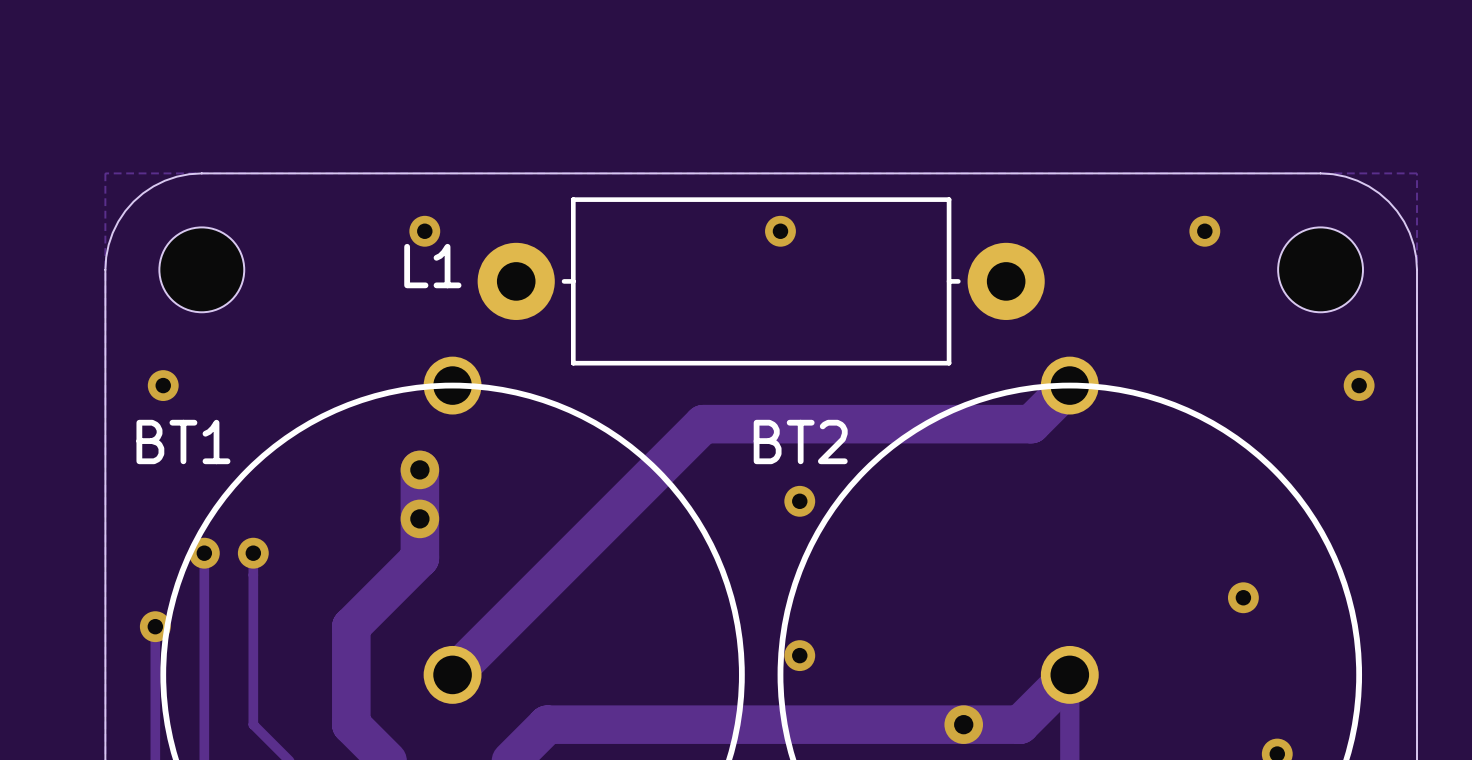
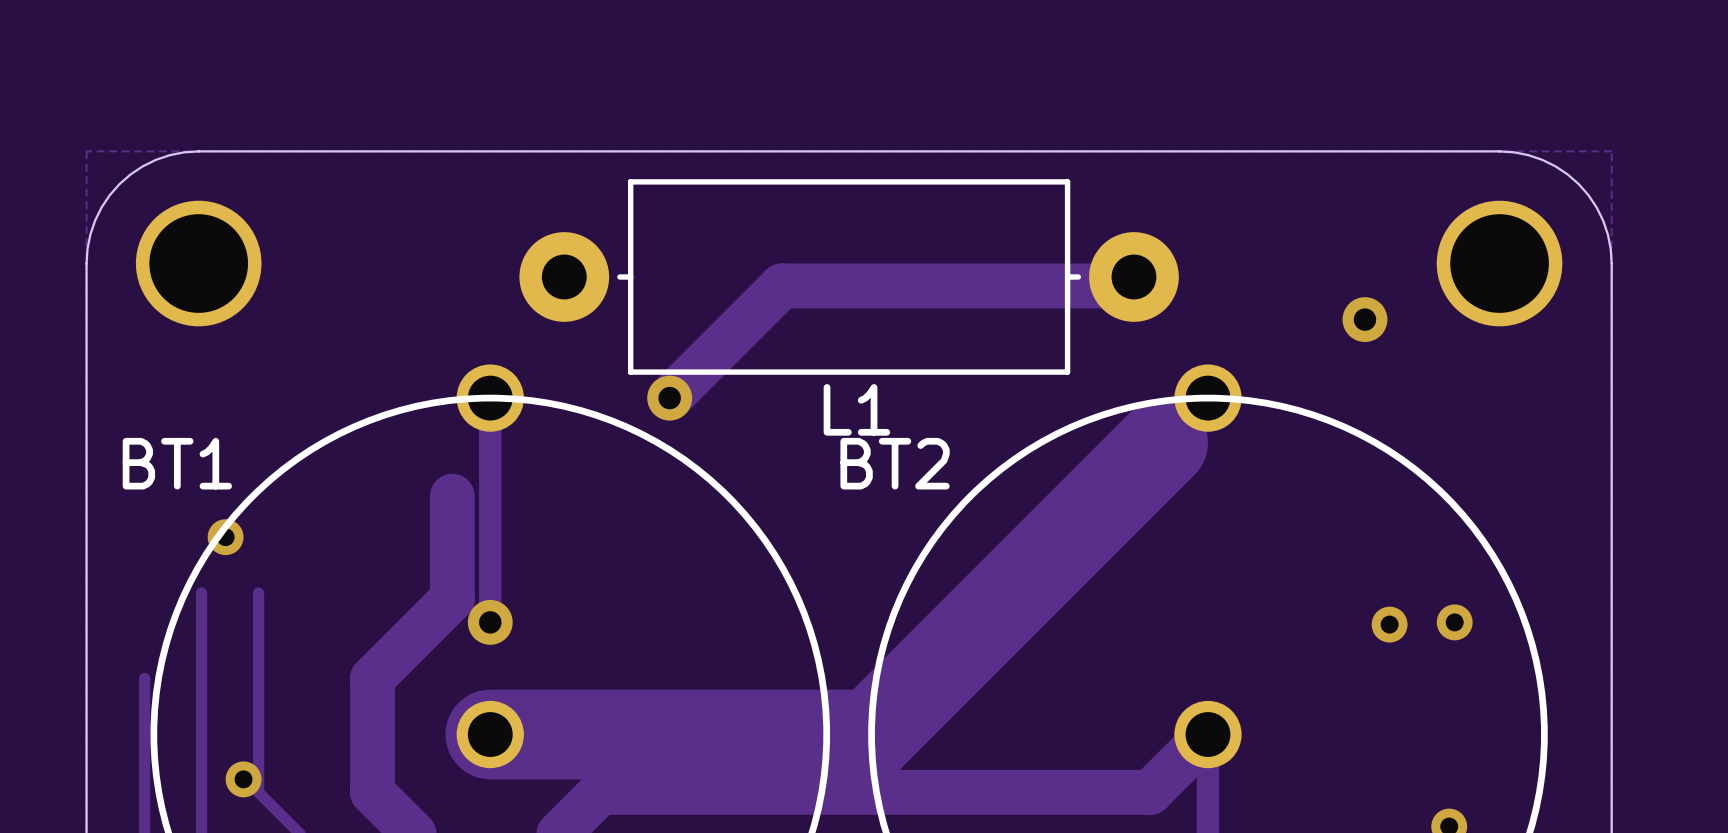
part footprint: [159, 227, 245, 313] -> [135, 200, 262, 327]
part footprint: [1278, 227, 1363, 313] -> [1436, 200, 1563, 327]
via: (424, 231) -> none
via: (780, 231) -> none
via: (1204, 231) -> none
L1 name position: L1 (432, 266) -> L1 (856, 409)
track: none -> (1127, 285) (781, 285) (669, 398)
via: none -> (1364, 319)
via: (163, 385) -> none
track: none -> (490, 398) (490, 622)
via: none -> (669, 398)
via: (1359, 385) -> none
track: (1031, 424) (703, 424) (452, 674) -> (1163, 442) (871, 734) (490, 734)
via: (419, 469) -> none
via: (799, 501) -> none
via: none -> (225, 537)
via: (419, 518) -> none
via: (204, 553) -> none
via: (253, 553) -> none
via: none -> (490, 622)
via: none -> (1454, 622)
via position: (1243, 597) -> (1389, 624)
via: (155, 626) -> none
via: (799, 655) -> none
via: none -> (243, 779)
via: (963, 724) -> none

